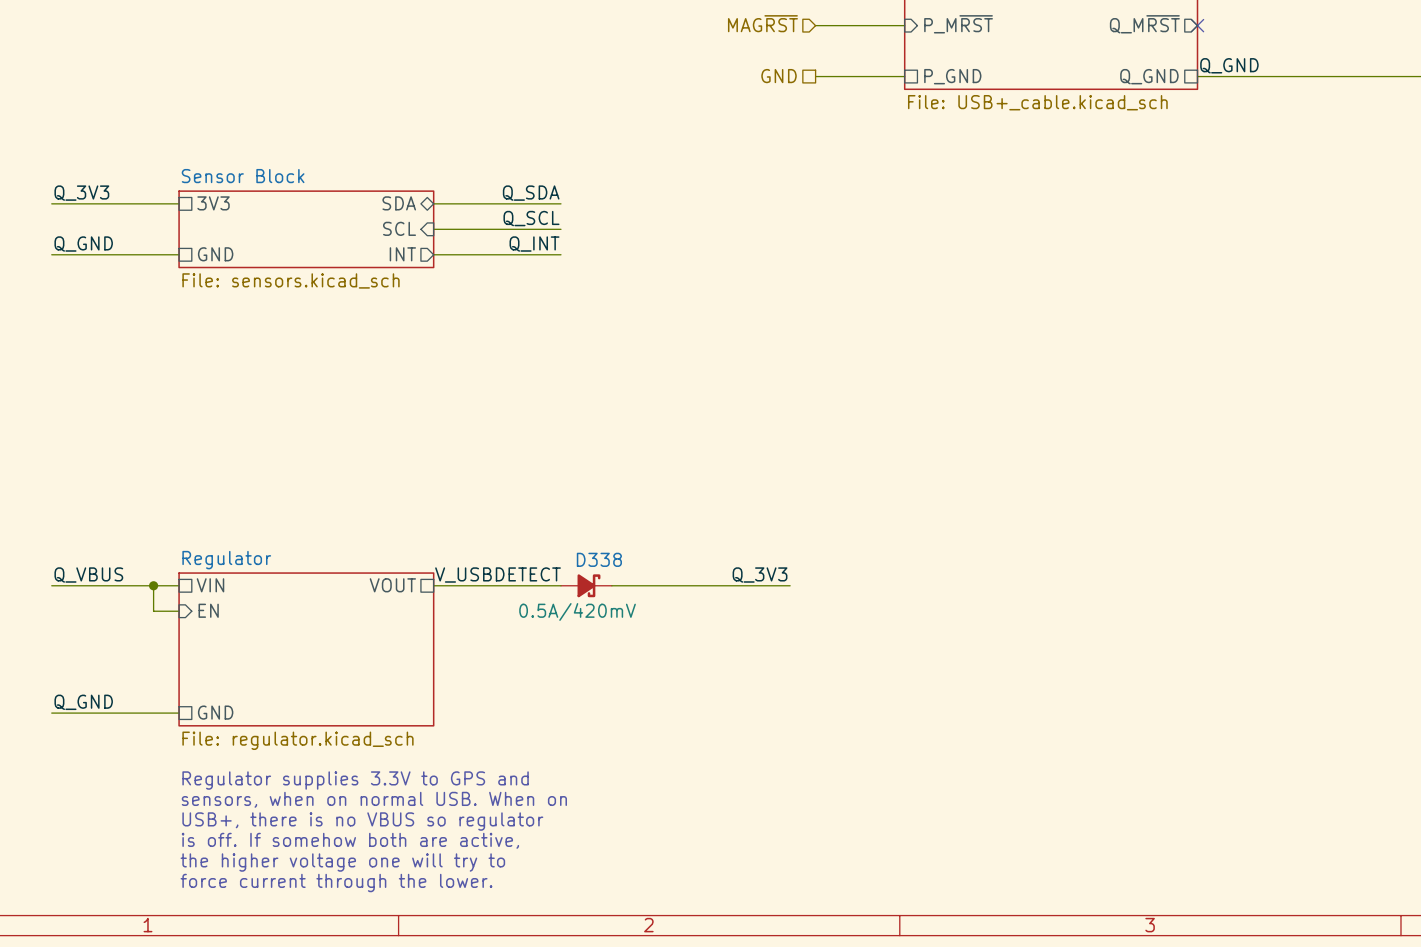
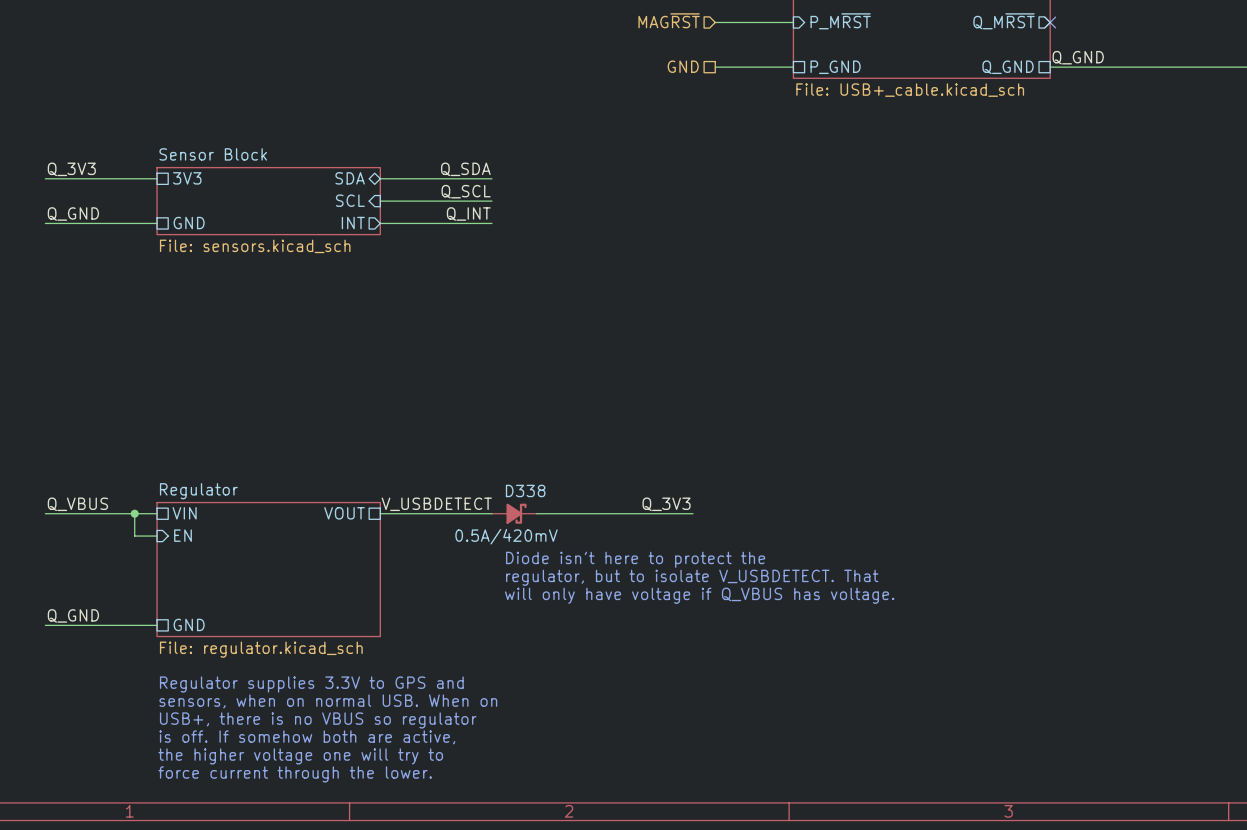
text: none -> Diode isn't here to protect the (635, 559)
text: none -> regulator, but to isolate V_USBDETECT. That (692, 577)
text: none -> will only have voltage if Q_VBUS has voltage. (699, 595)

